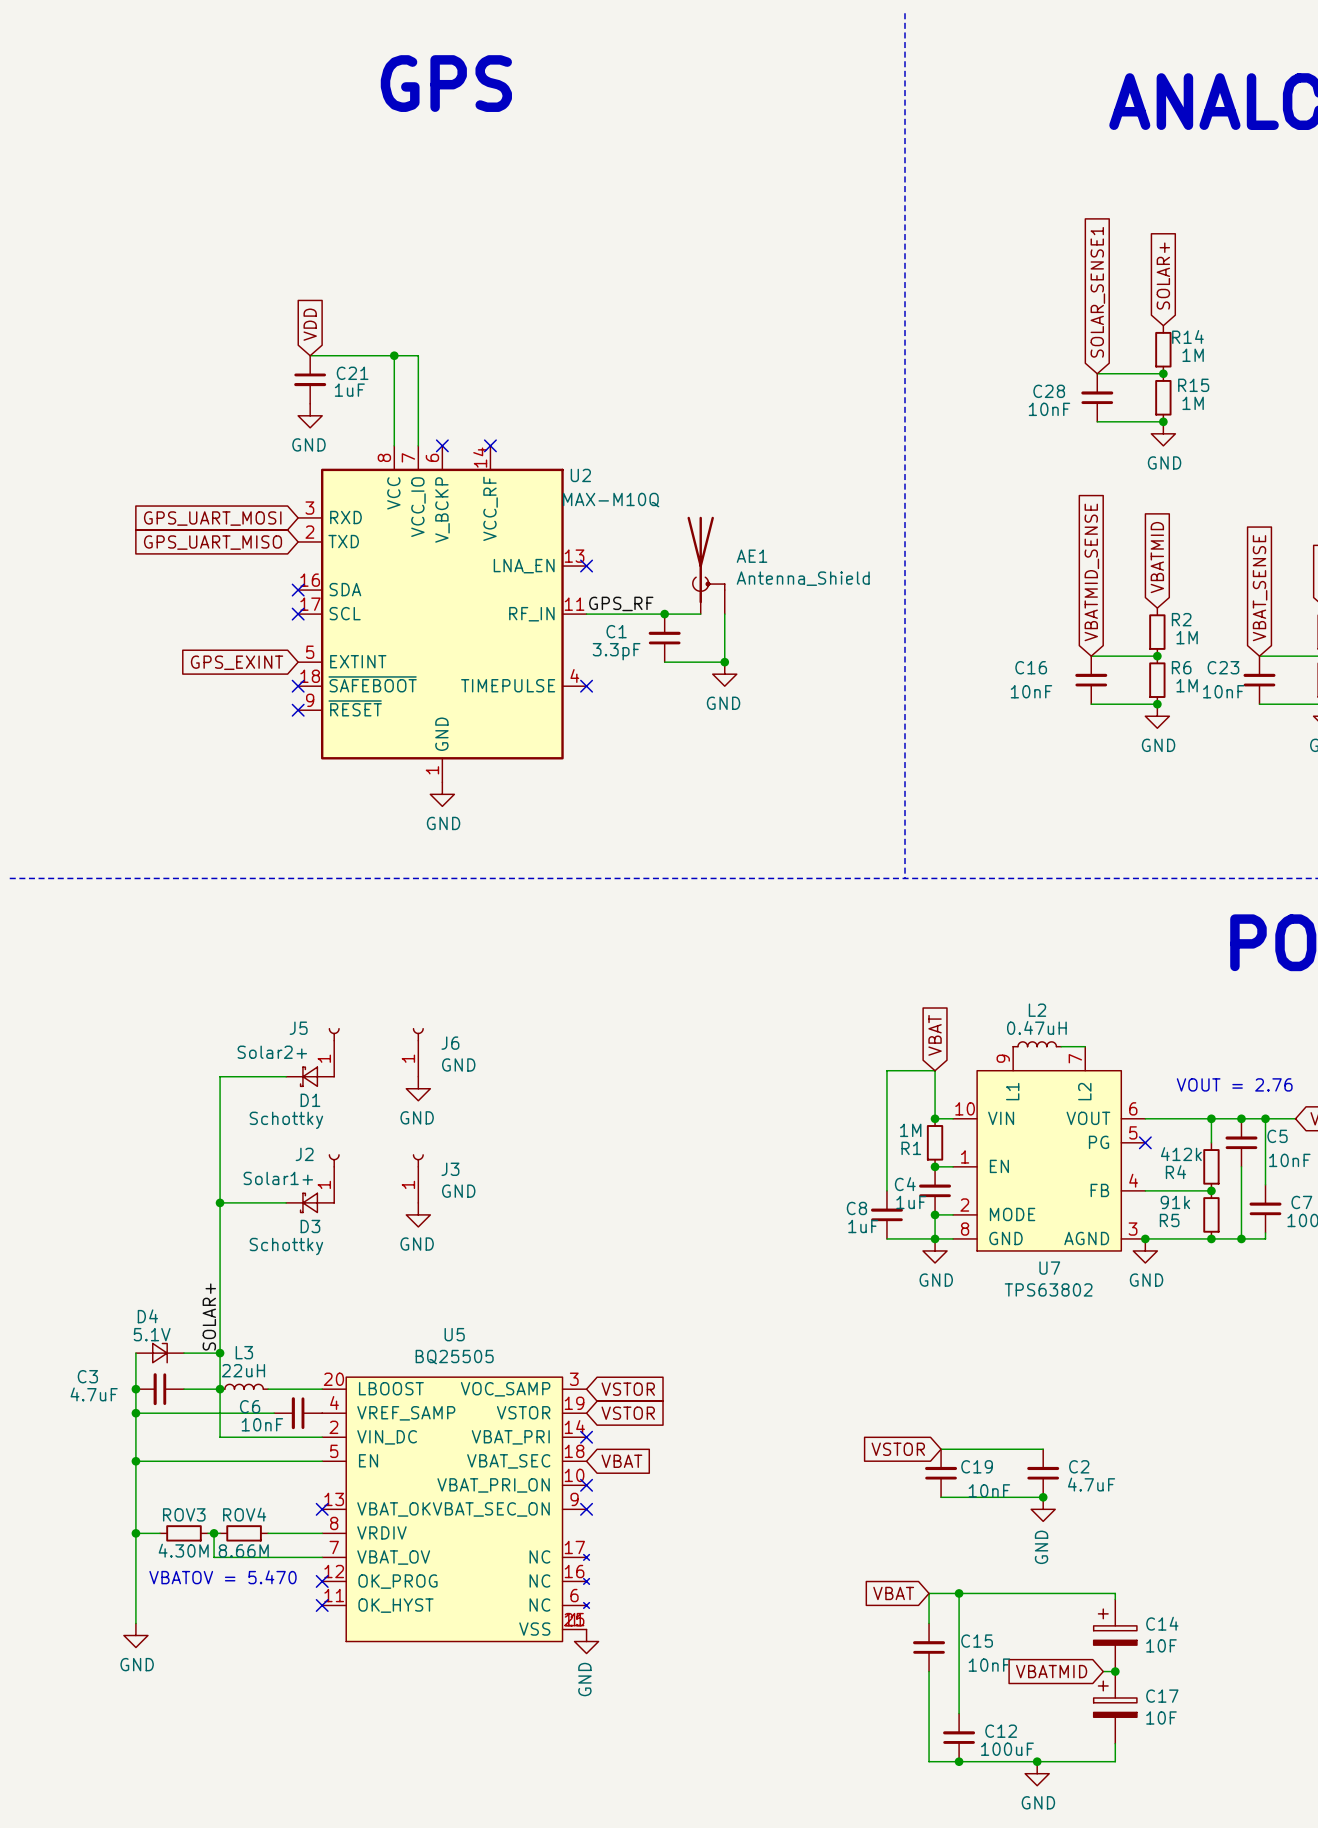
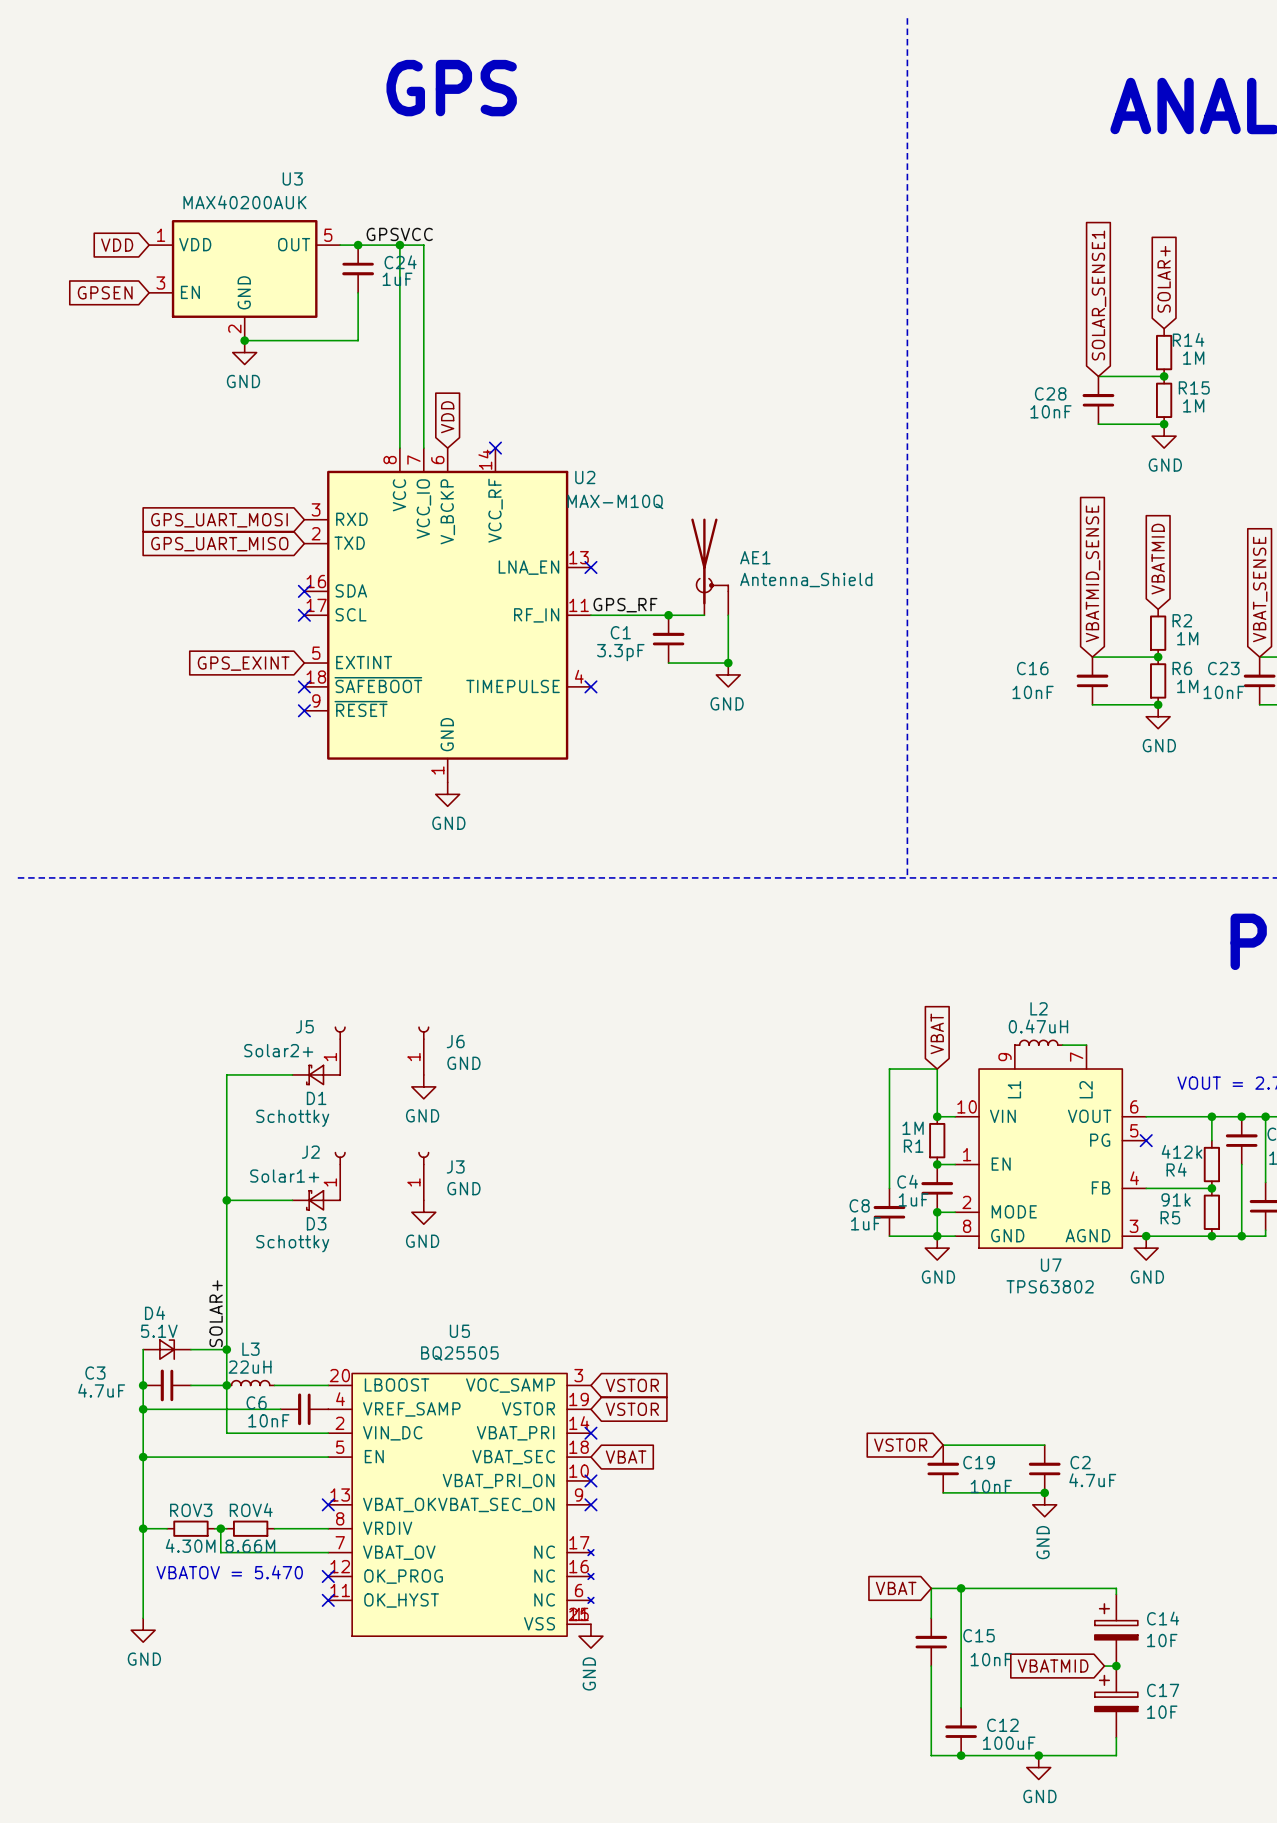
label: none -> GPSVCC (399, 234)
global label: none -> VDD (117, 245)
junction: none -> (358, 245)
wire: none -> (399, 245) (399, 358)
junction: none -> (399, 245)
C24: none -> 1uF (358, 268)
U3: none -> MAX40200AUK (244, 280)
global label: none -> GPSEN (105, 292)
wire: none -> (358, 292) (358, 340) (244, 340)
global label: VDD (310, 324) -> none
junction: none -> (244, 340)
wire: (310, 355) (418, 355) -> (340, 245) (423, 245) (423, 358)
junction: (394, 355) -> none
C21: 1uF (310, 379) -> none
global label: none -> VDD (447, 417)
power symbol position: GND (310, 415) -> GND (244, 352)
no-connect mark: (442, 445) -> none

